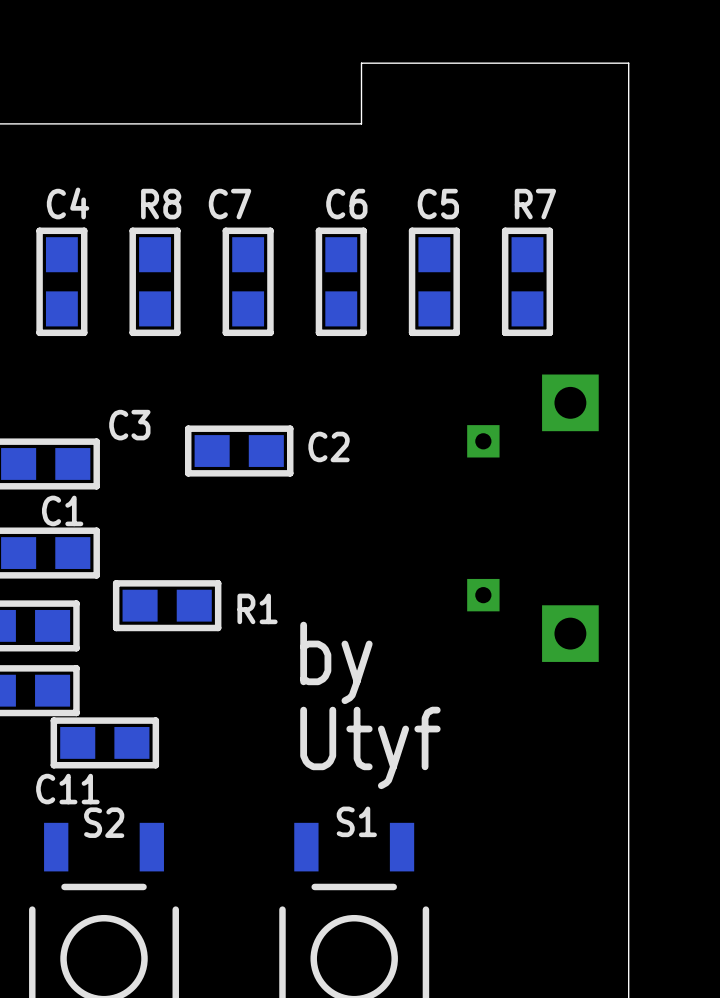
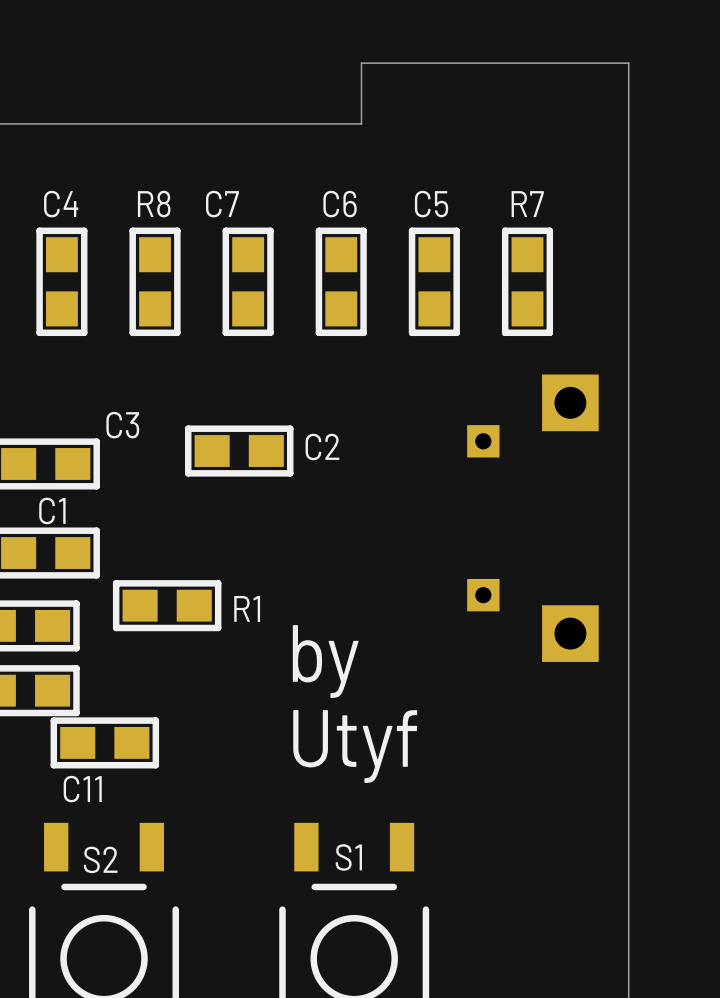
S1 name position: S1 (356, 821) -> S1 (348, 857)
S2 name position: S2 (104, 822) -> S2 (100, 859)

